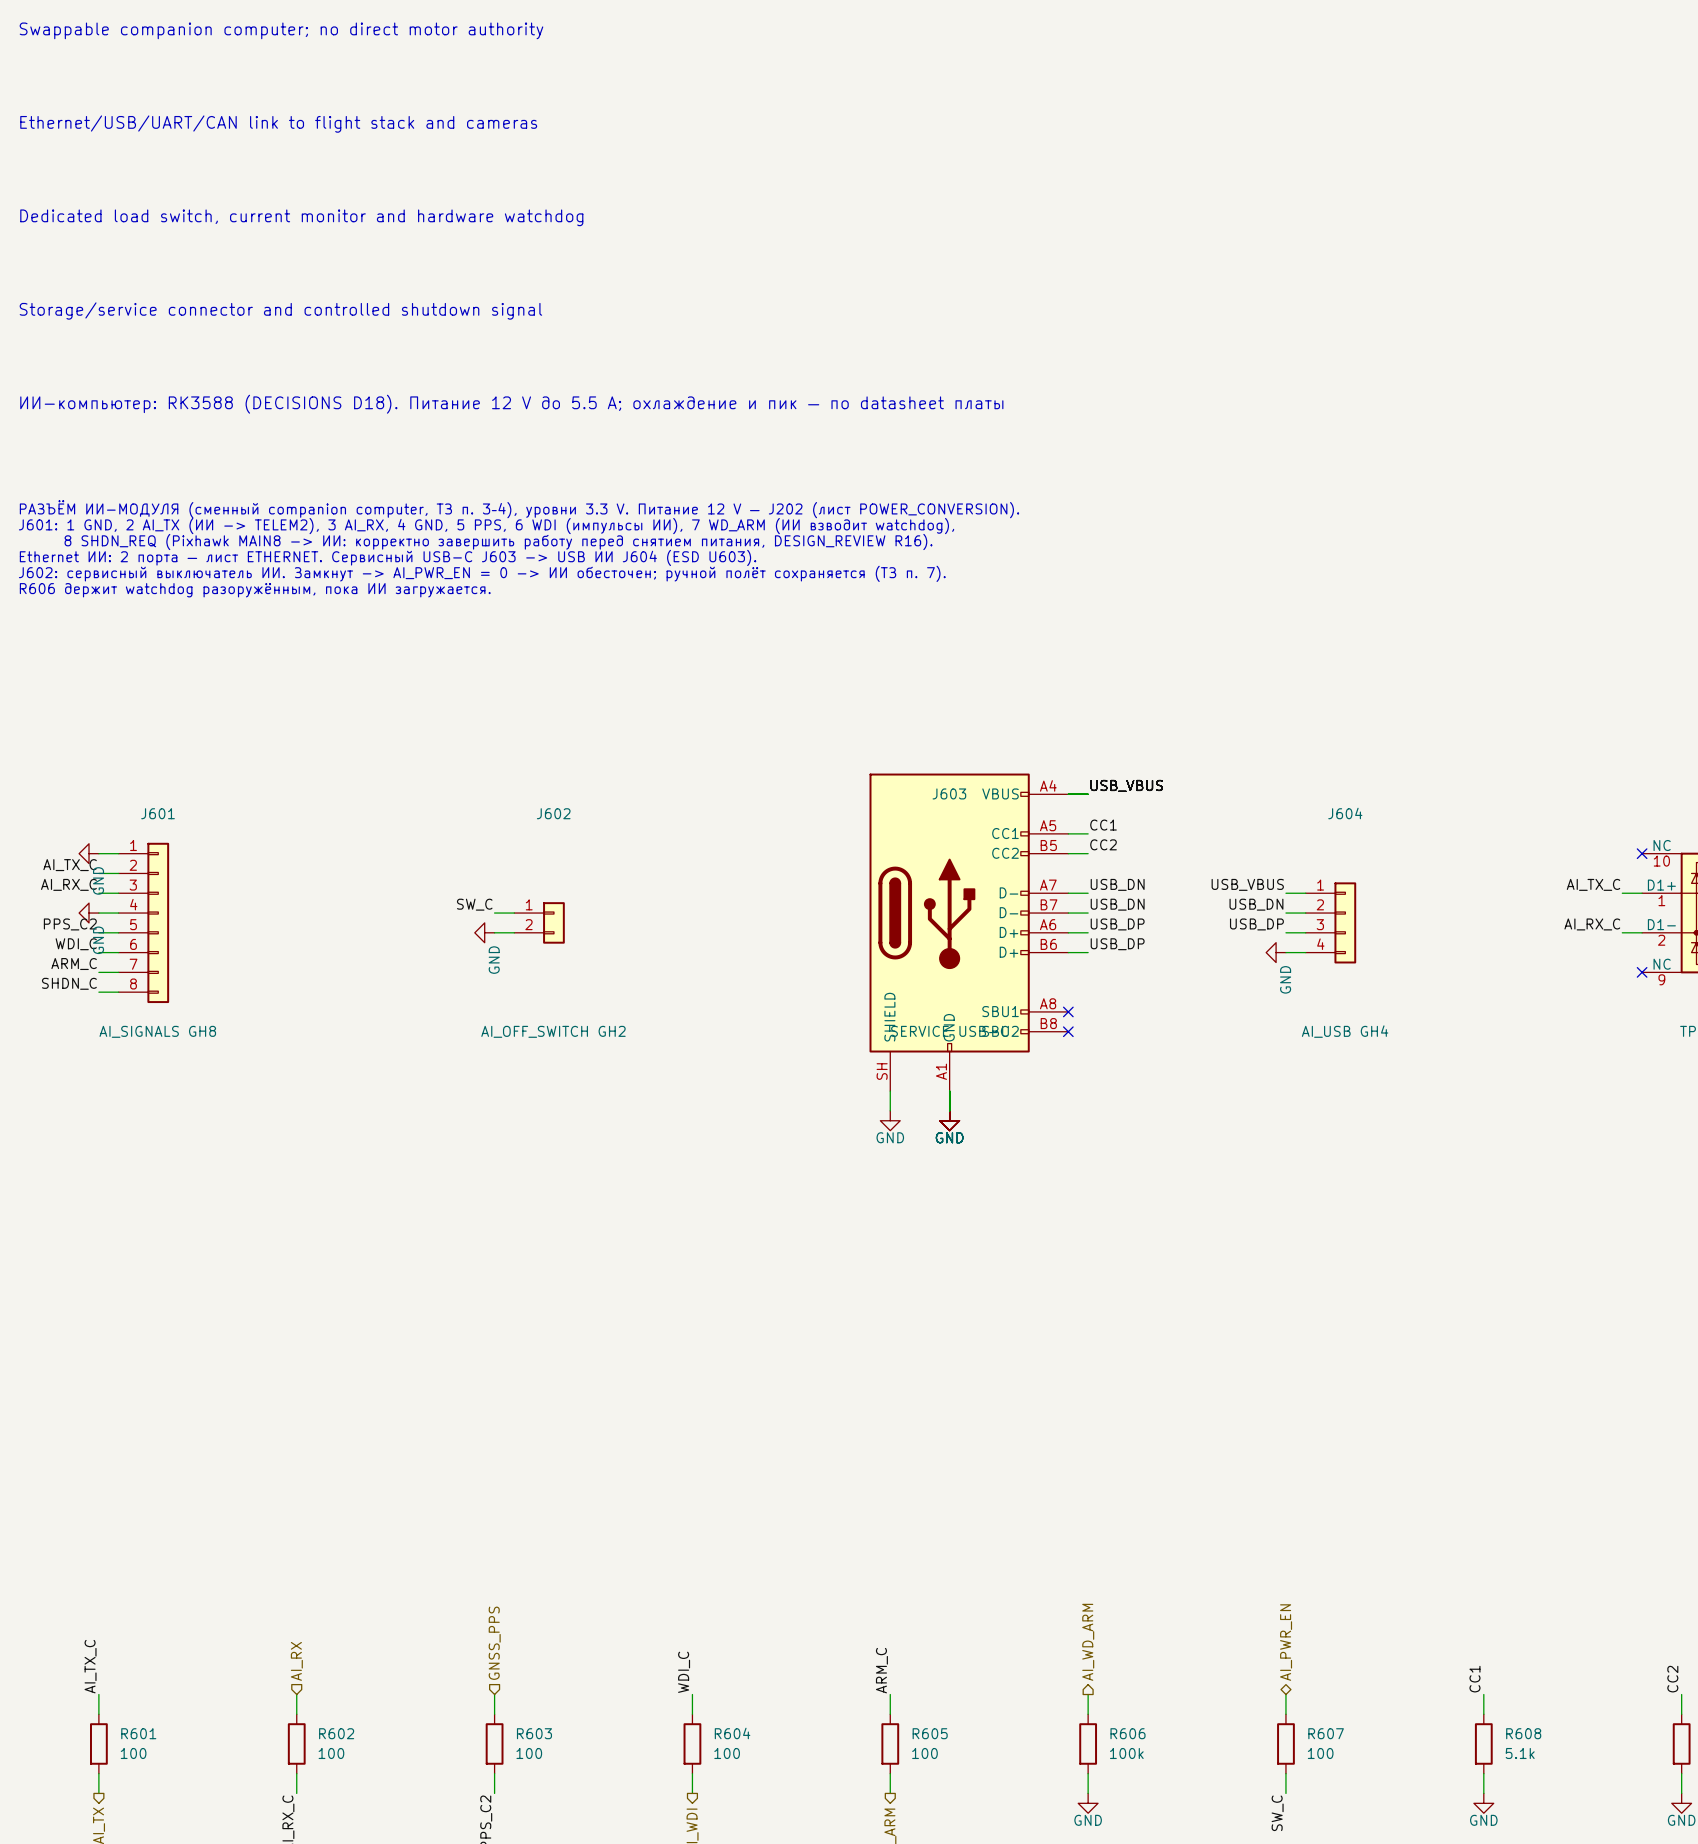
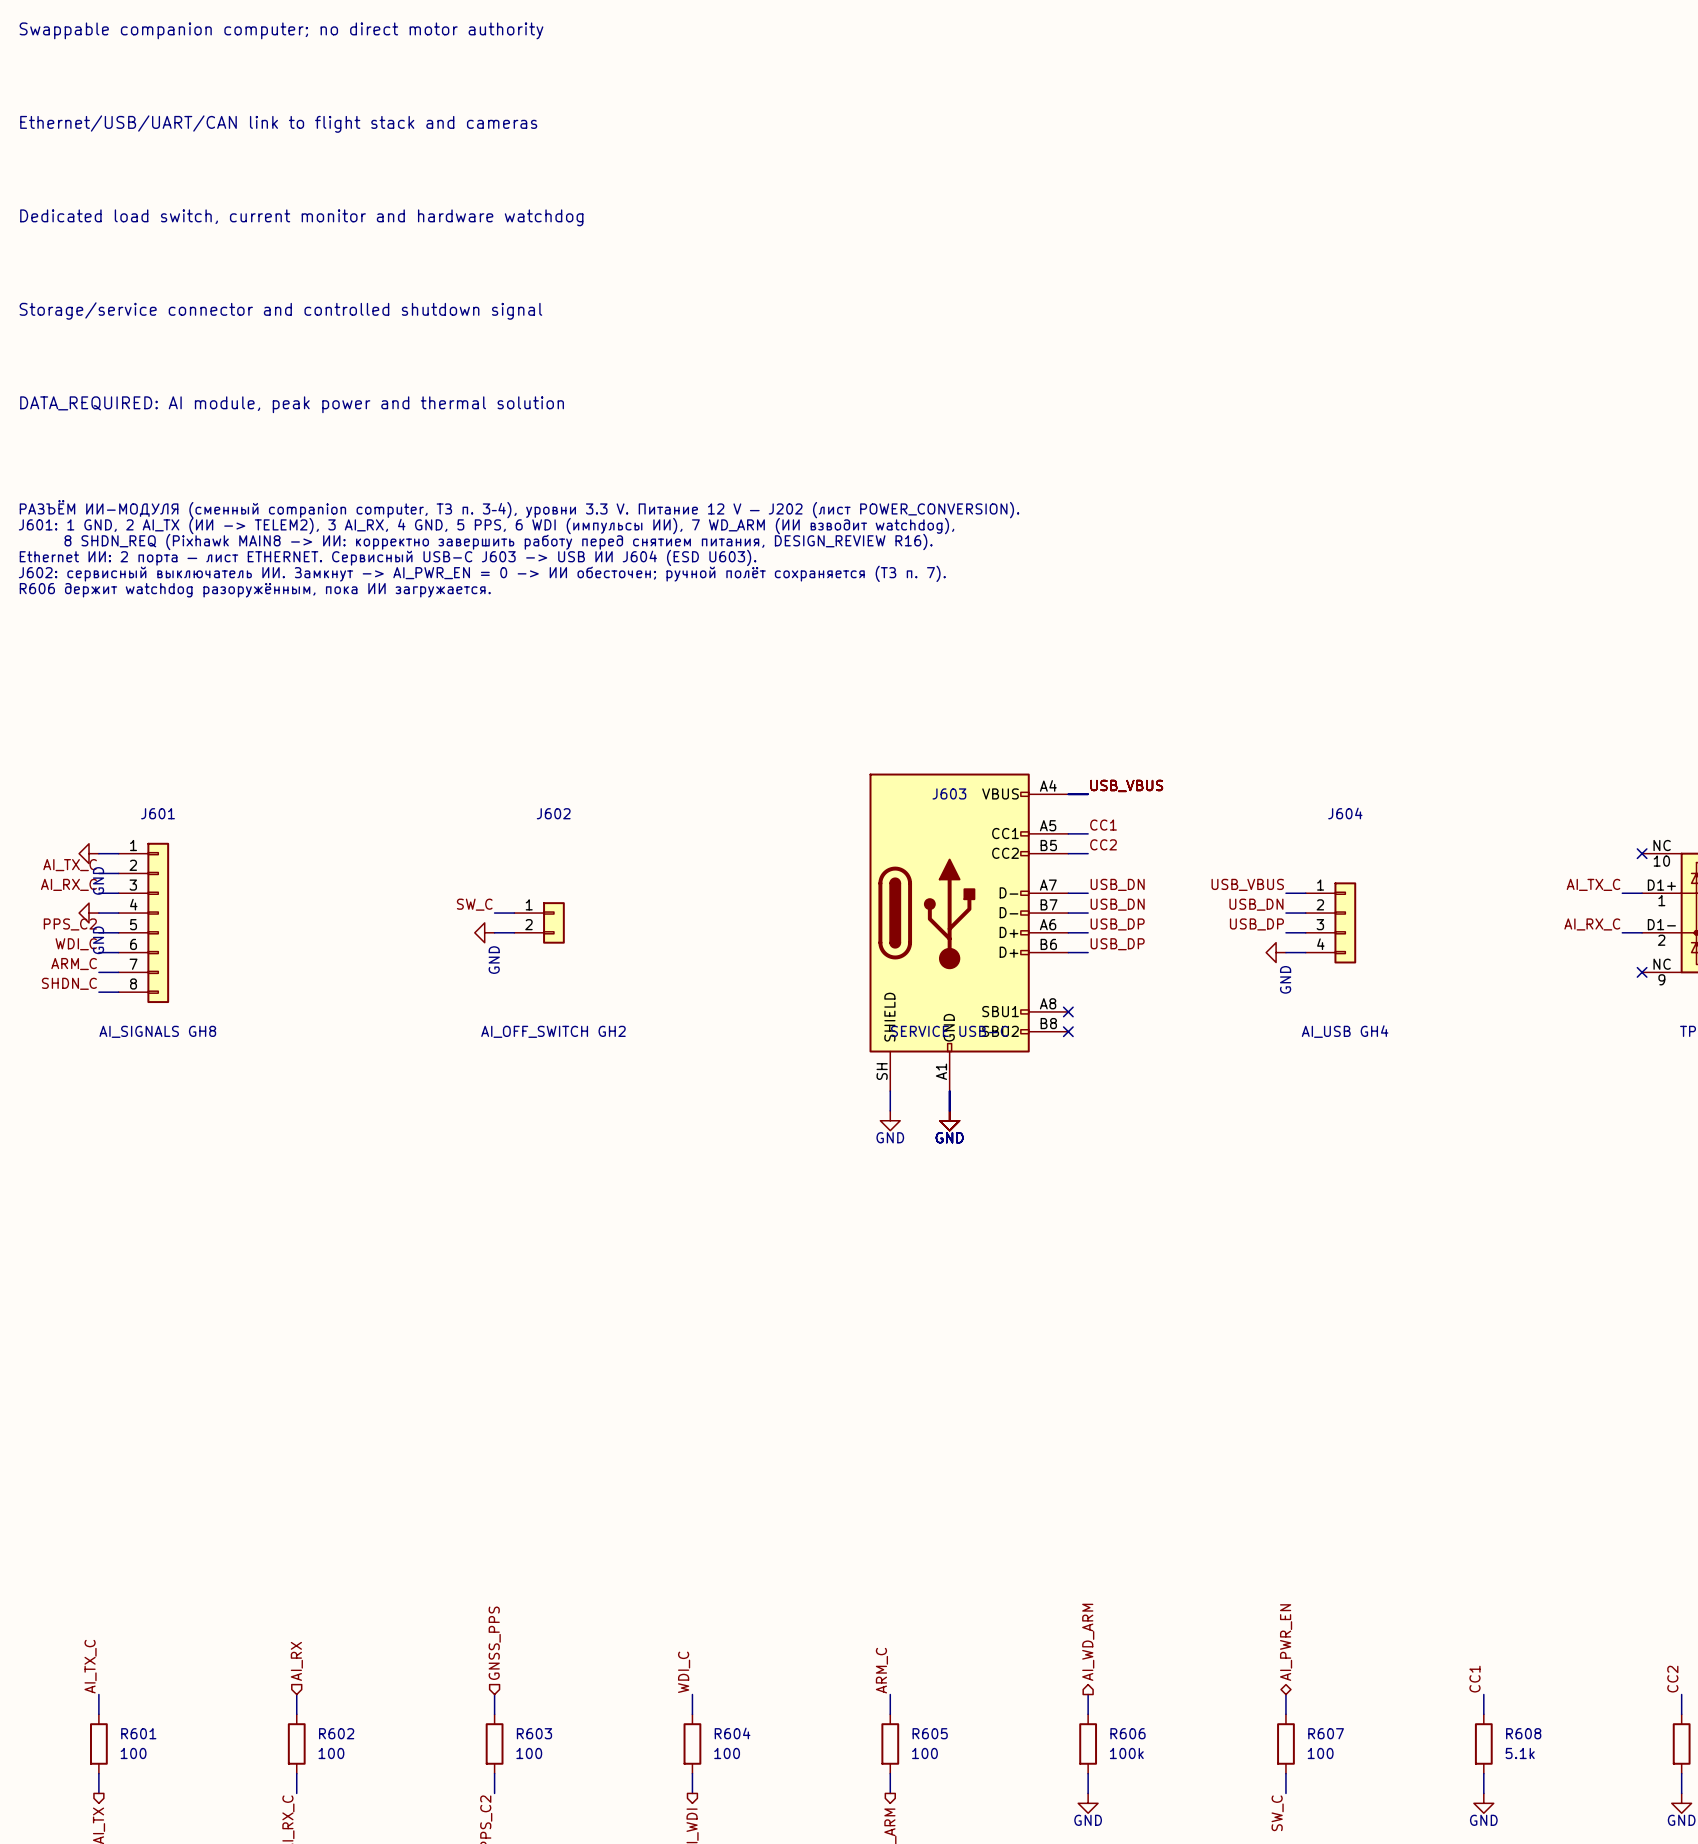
text: ИИ-компьютер: RK3588 (DECISIONS D18). Питание 12 V до 5.5 A; охлаждение и пик — по datasheet платы (511, 404) -> DATA_REQUIRED: AI module, peak power and thermal solution (292, 404)

